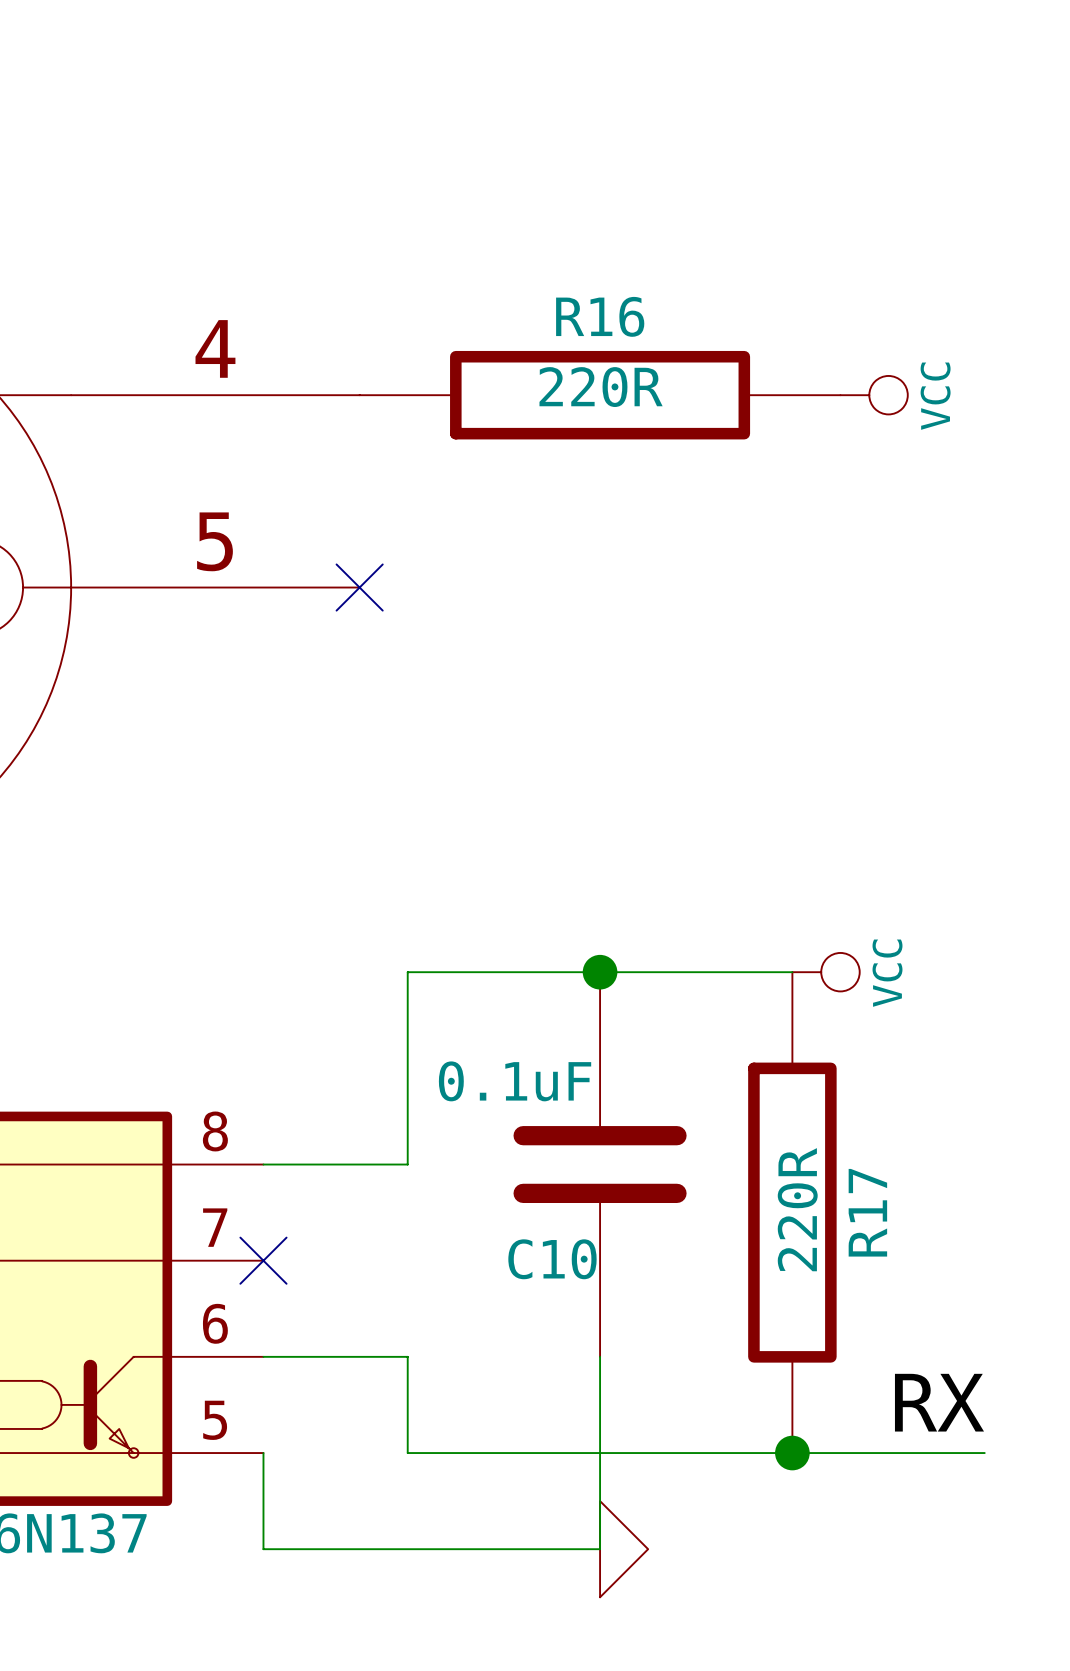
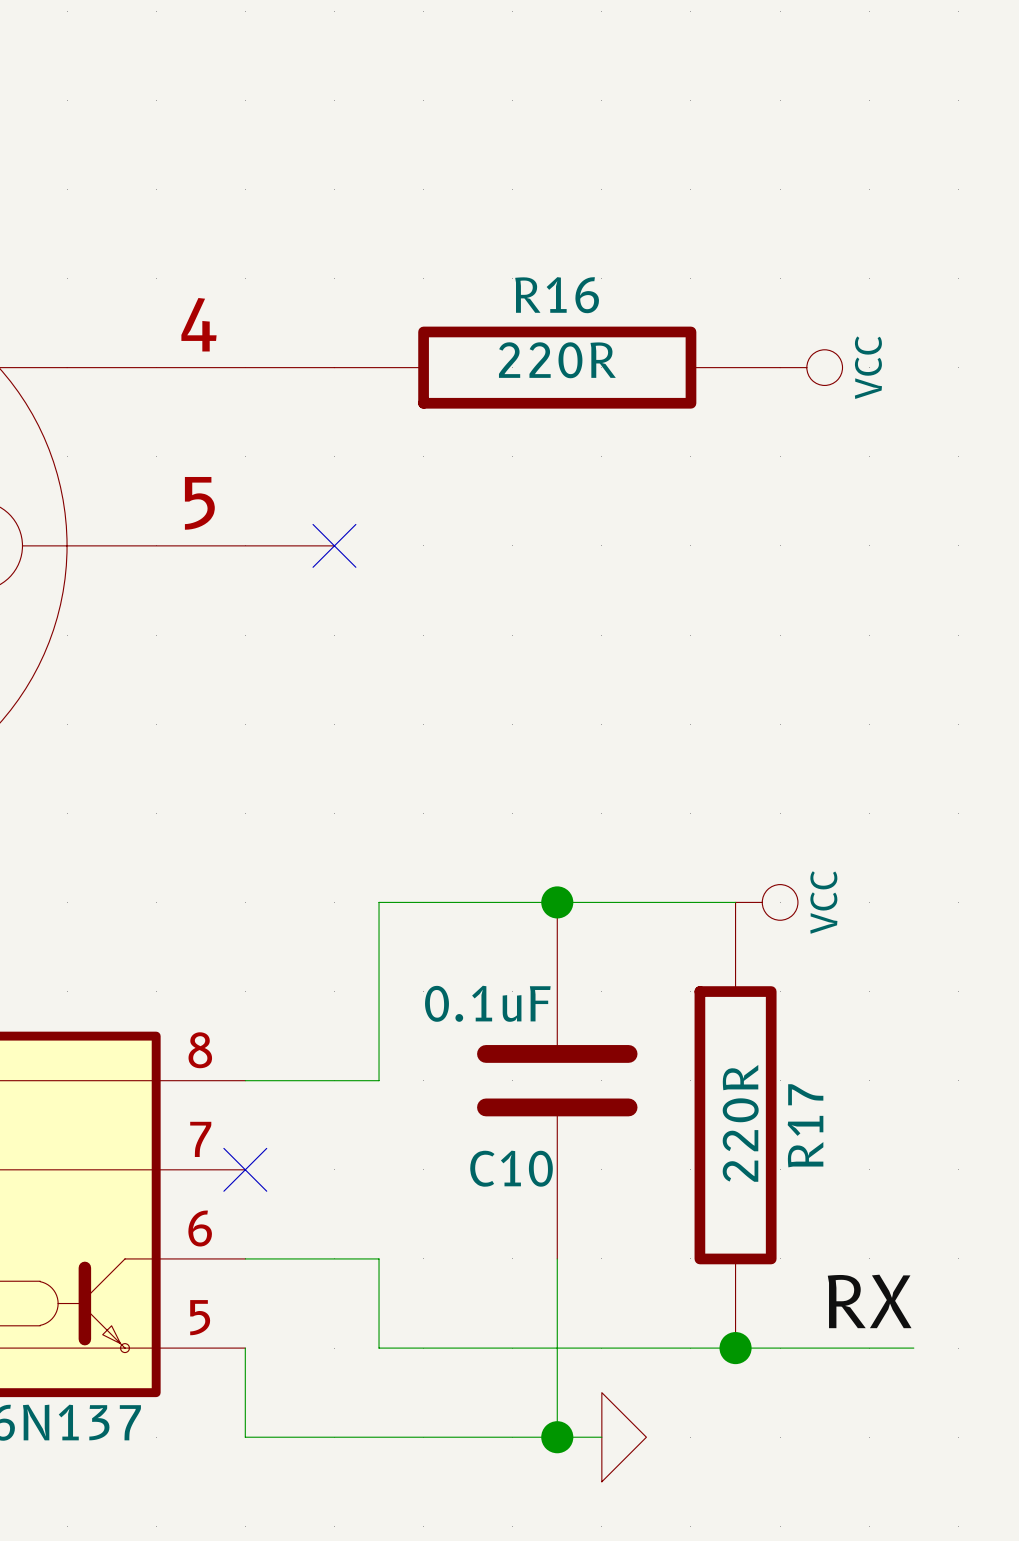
wire: none -> (557, 1437) (601, 1437)
junction: none -> (557, 1437)
power symbol position: (624, 1549) -> (624, 1437)

